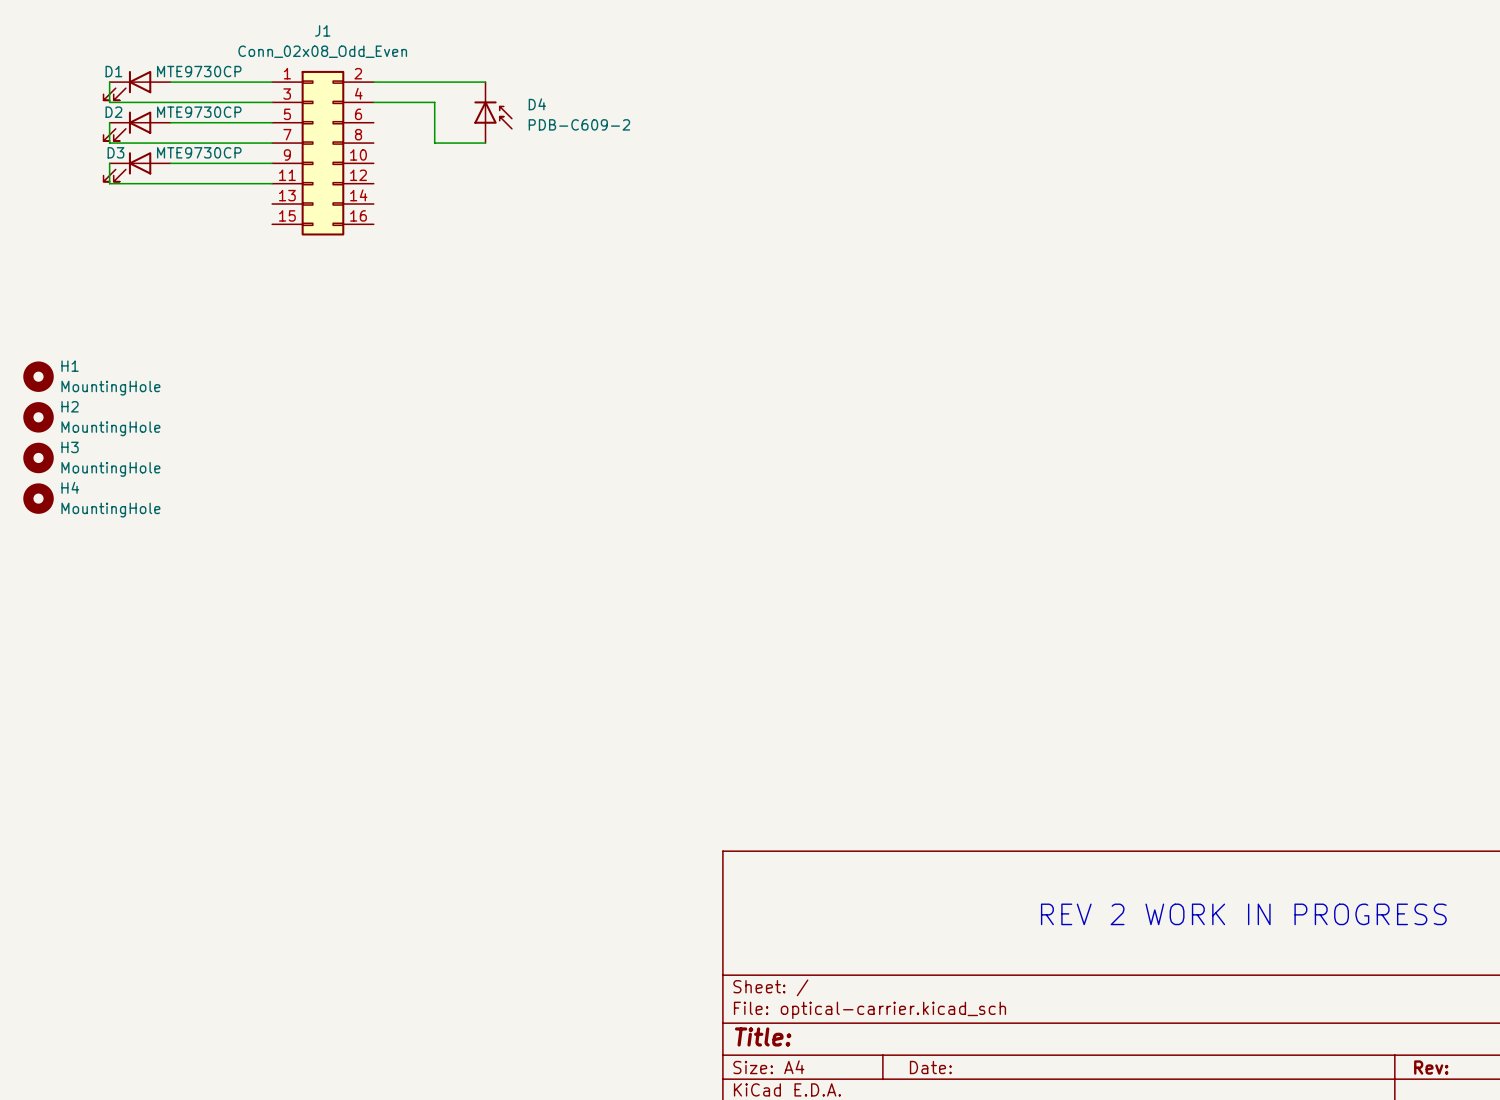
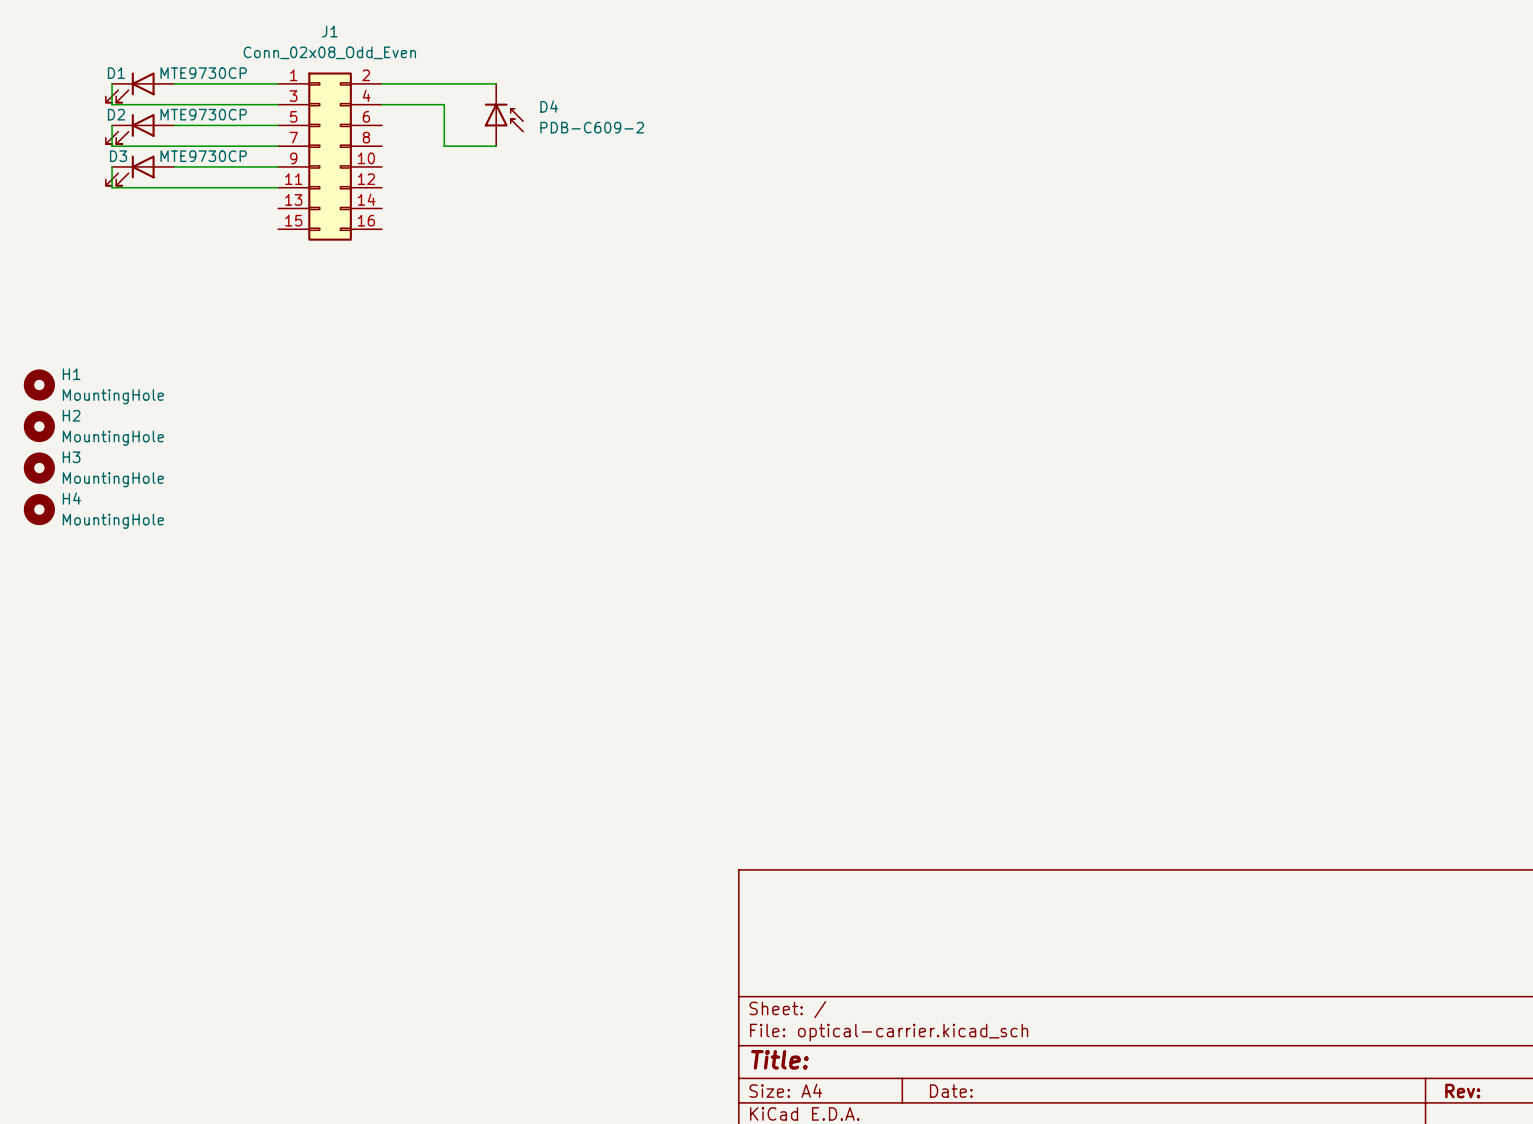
text: REV 2 WORK IN PROGRESS (1243, 914) -> none

